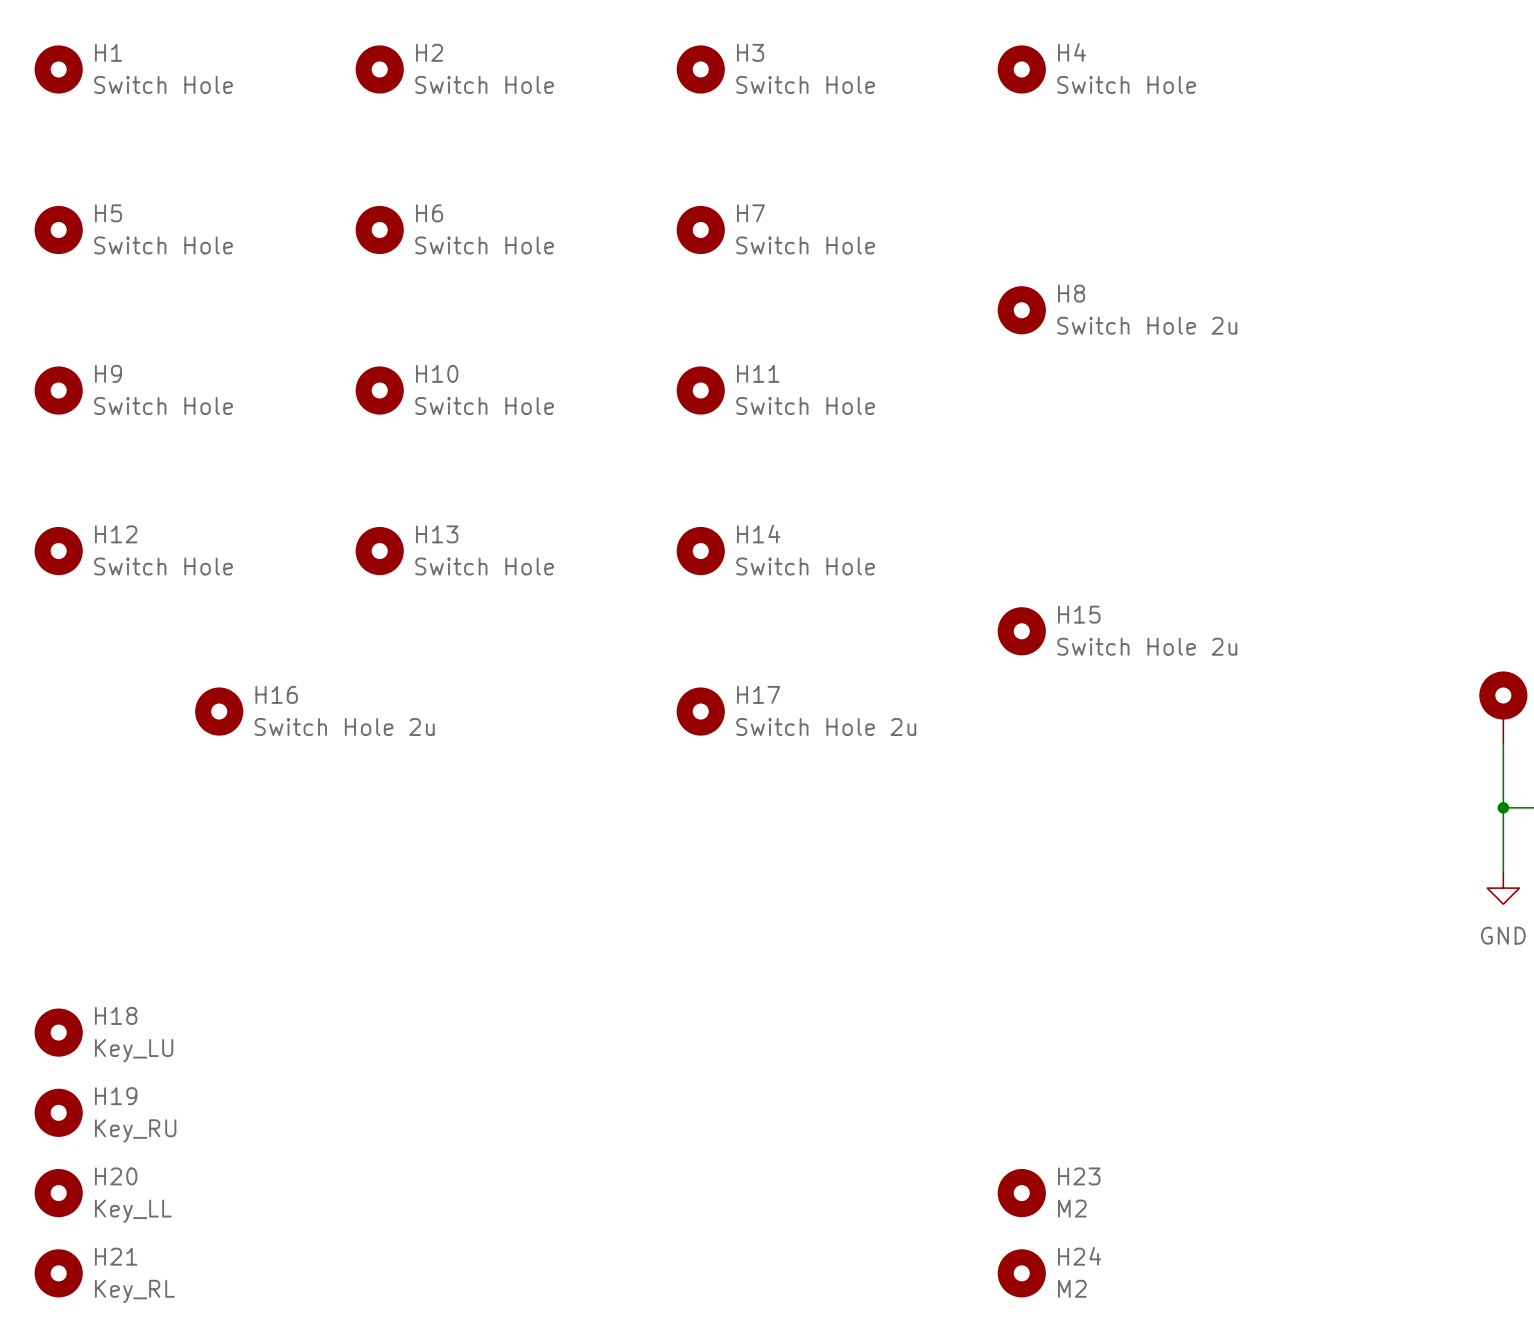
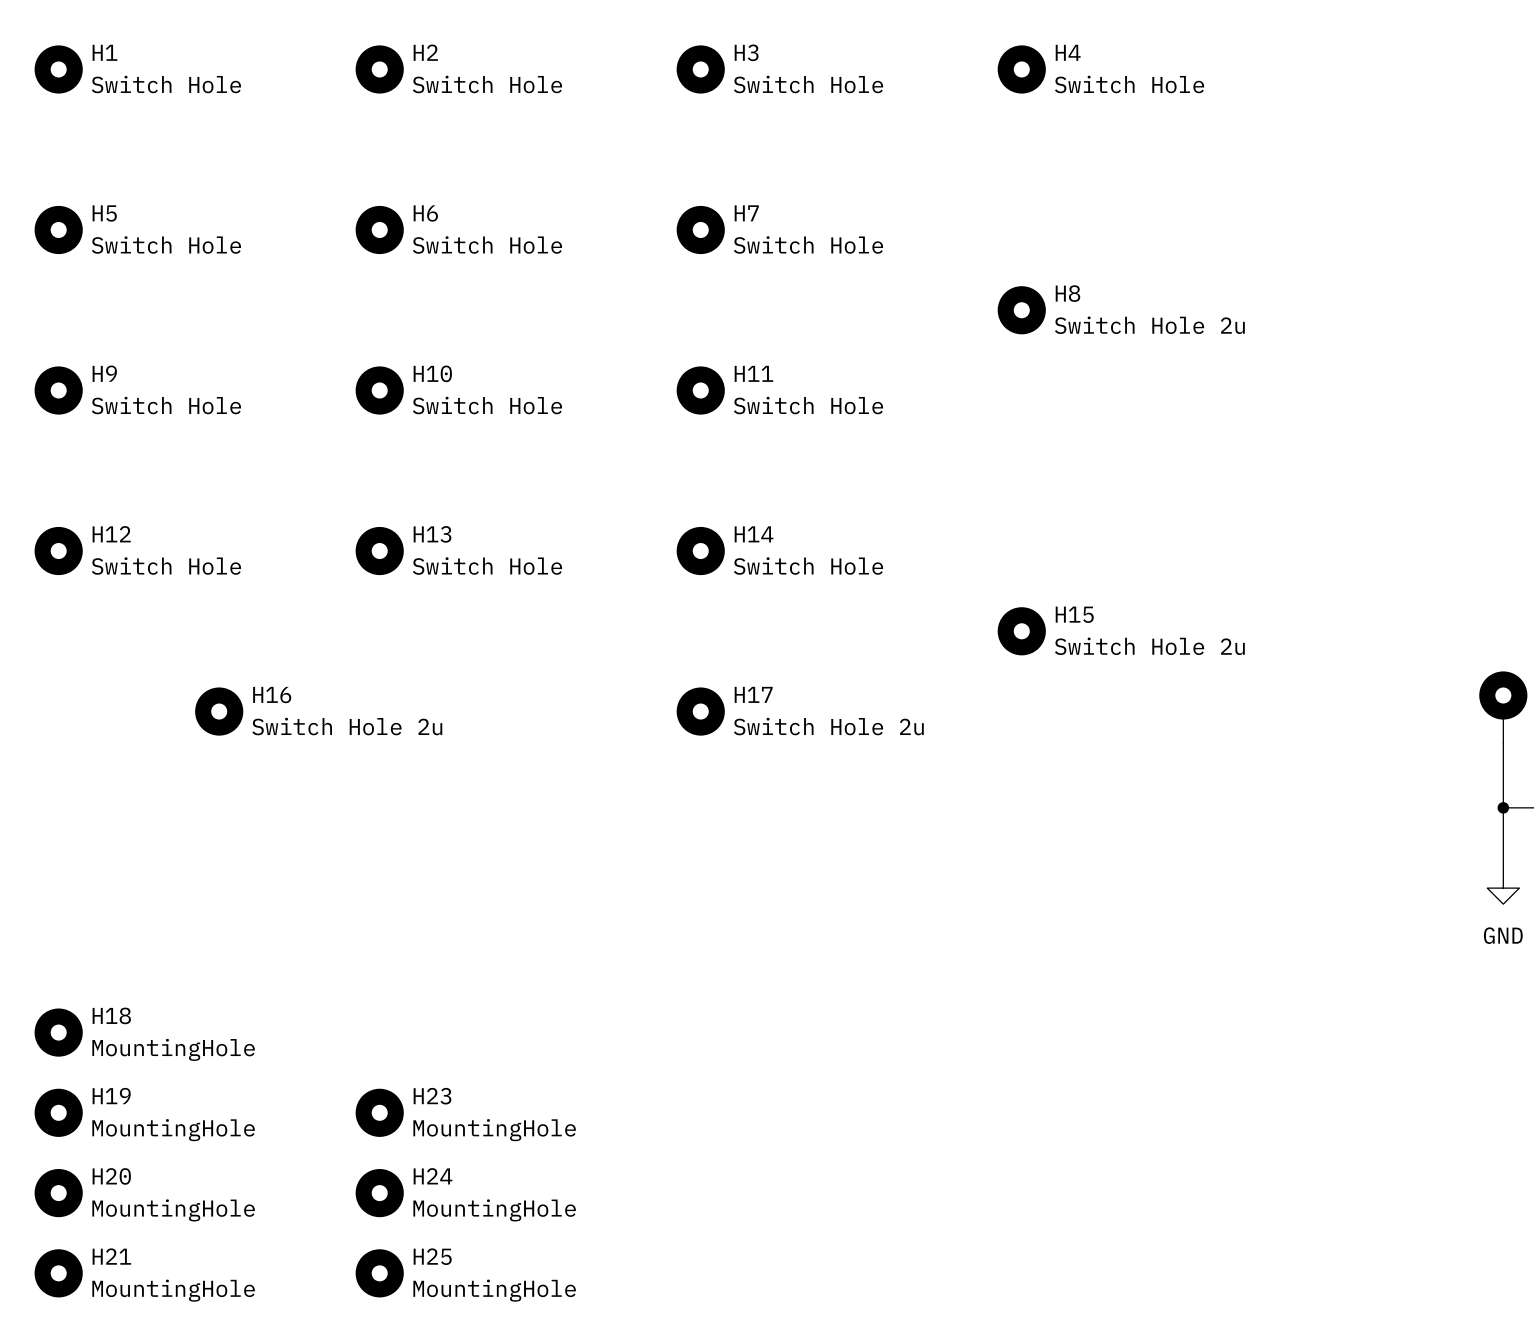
H18 value: Key_LU (134, 1050) -> MountingHole (173, 1049)
H19 value: Key_RU (135, 1130) -> MountingHole (173, 1130)
H23 position: (1021, 1193) -> (379, 1112)
H23 value: M2 (1072, 1208) -> MountingHole (494, 1130)
H20 value: Key_LL (133, 1211) -> MountingHole (173, 1210)
H25: none -> MountingHole (379, 1273)
H24 position: (1021, 1273) -> (379, 1193)
H24 value: M2 (1072, 1288) -> MountingHole (494, 1210)
H21 value: Key_RL (134, 1291) -> MountingHole (173, 1290)

